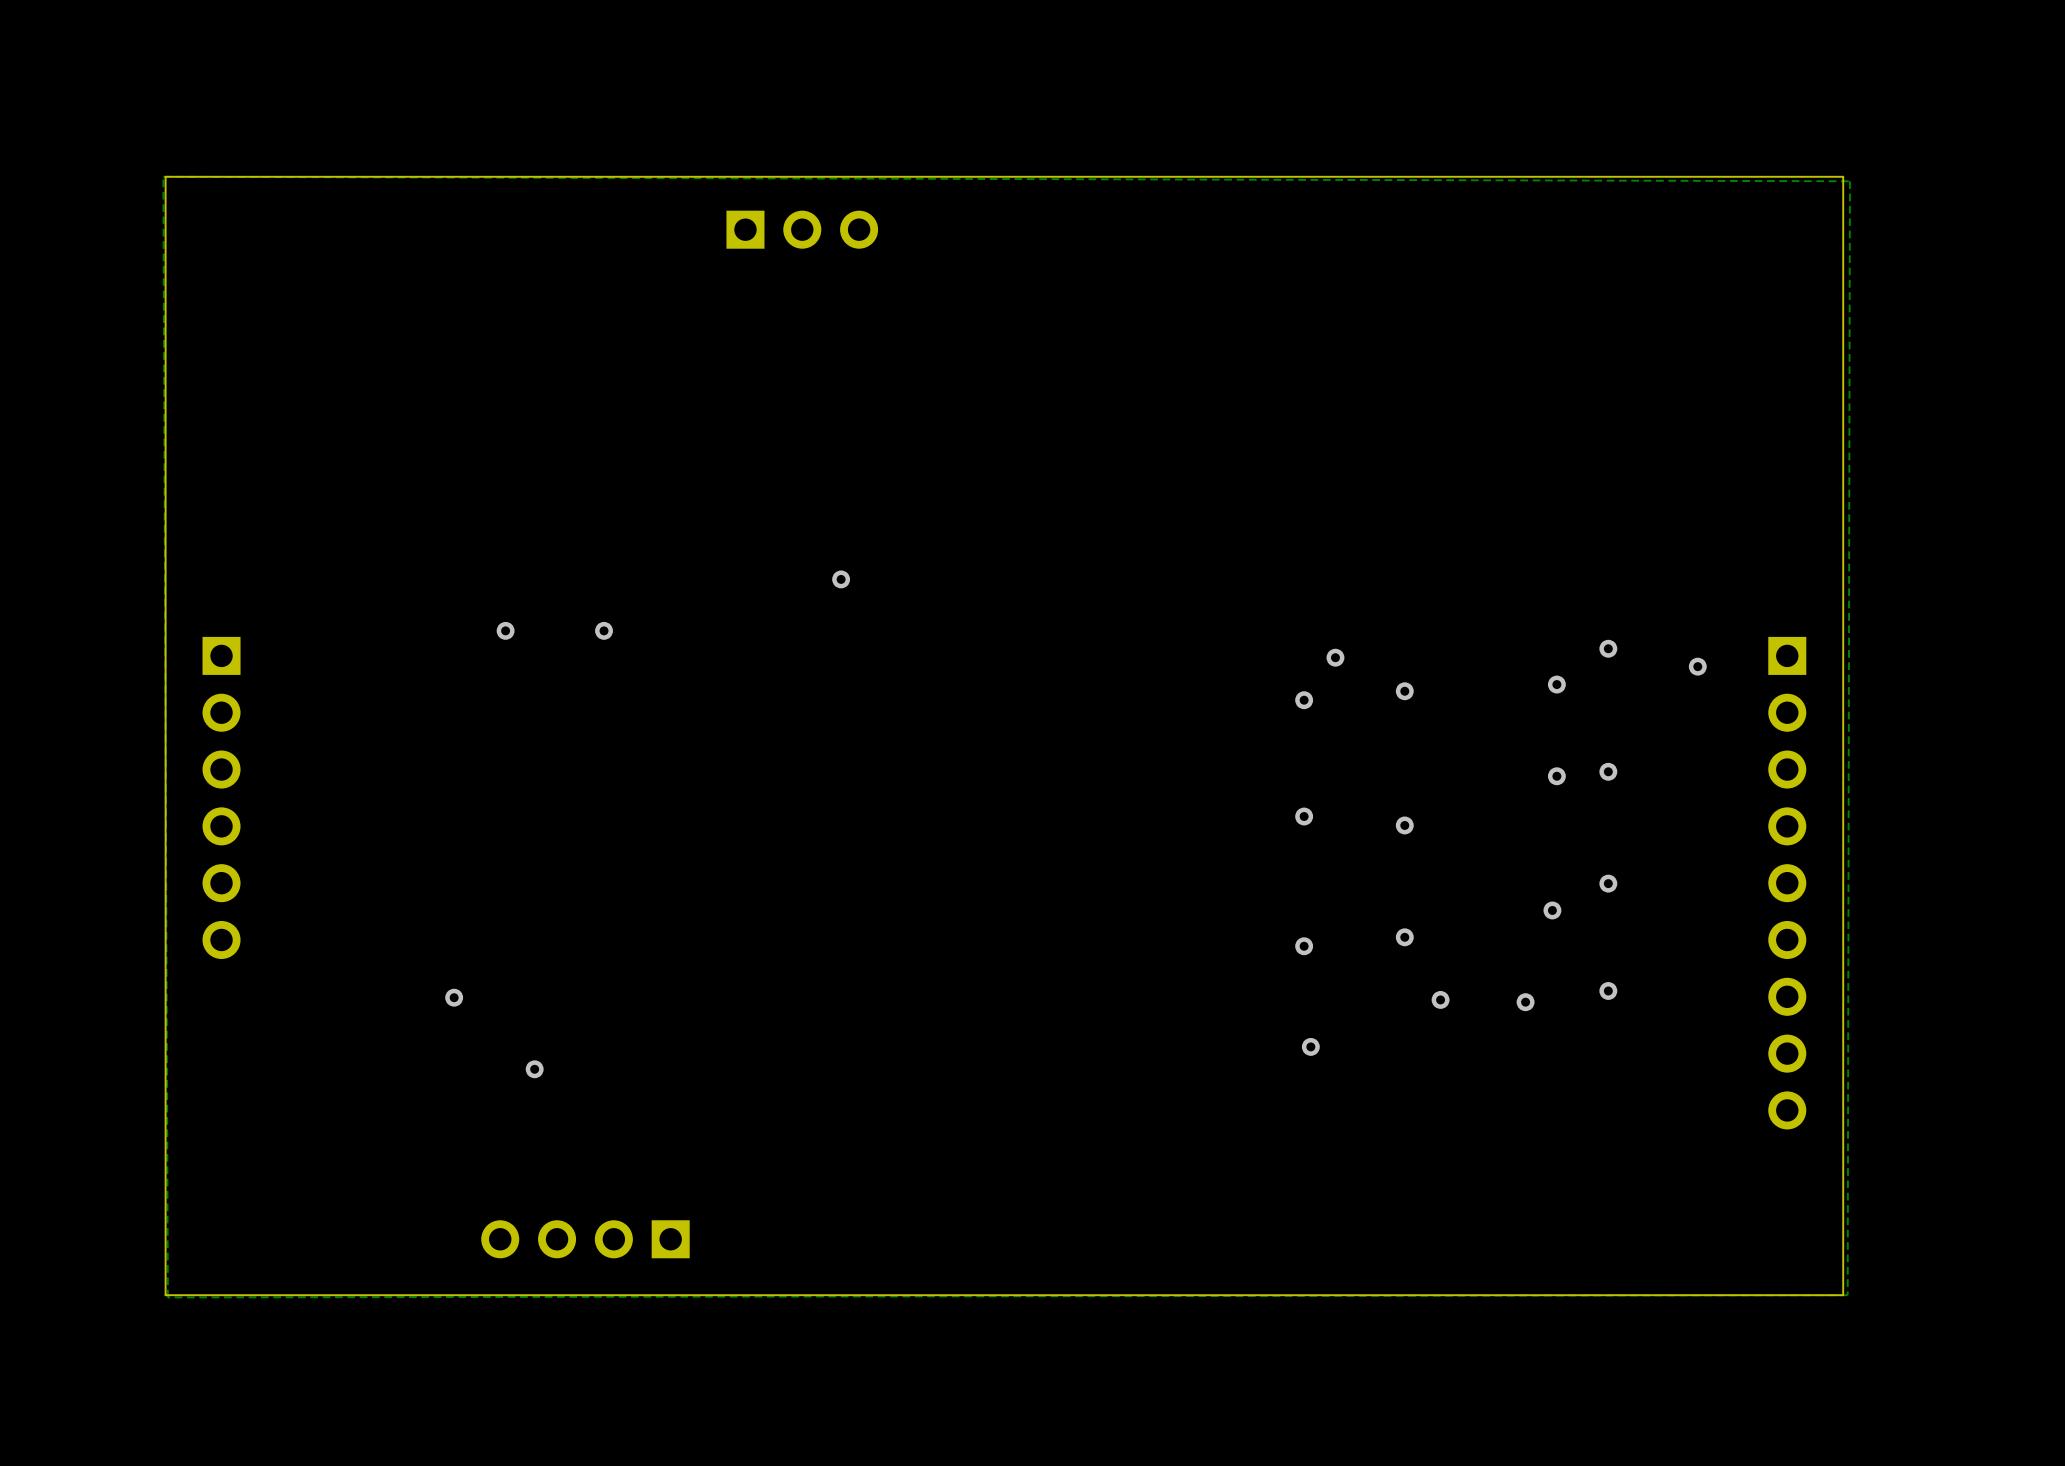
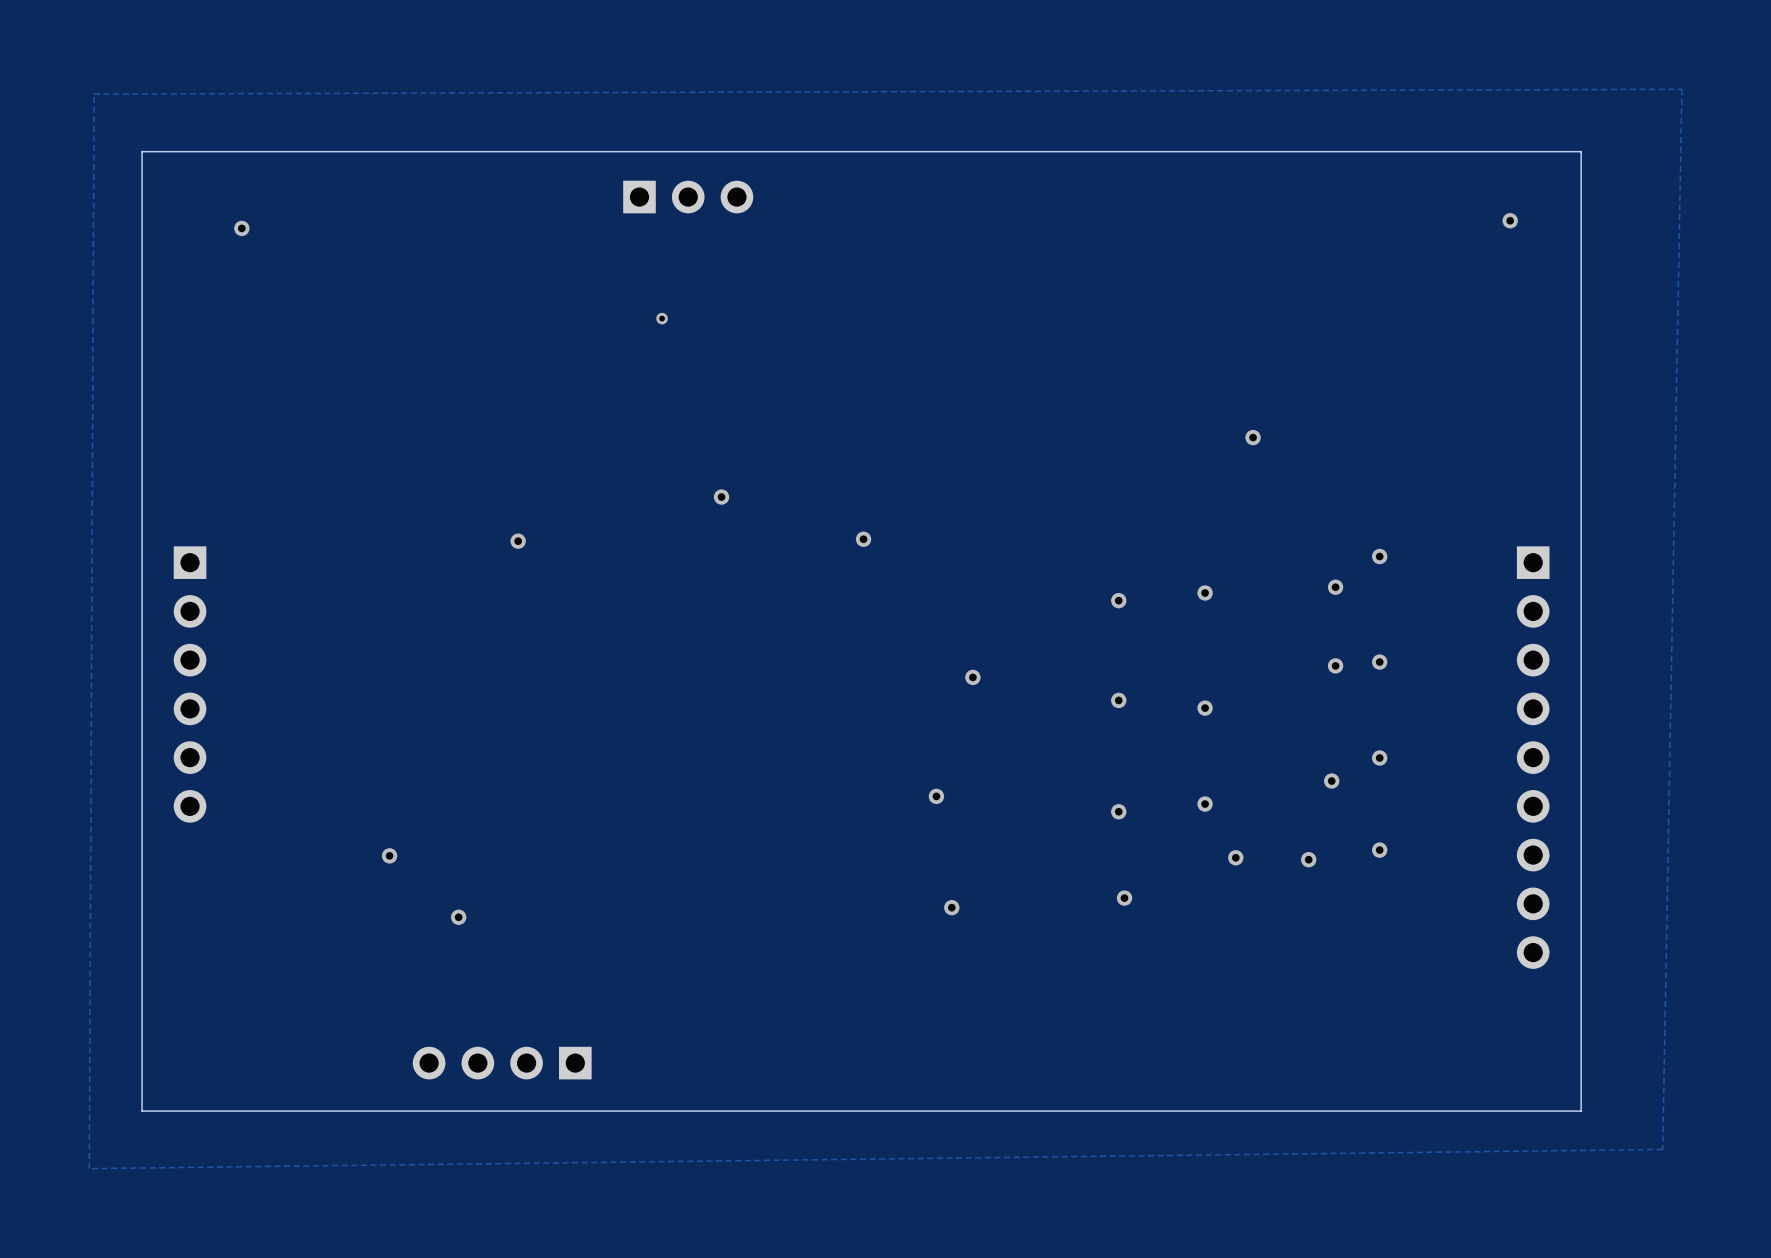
zone outline: (163, 176) (167, 1297) (1847, 1295) (1849, 181) (163, 176) -> (1681, 89) (1662, 1149) (89, 1168) (94, 94) (1681, 89)
via: none -> (1510, 220)
via: none -> (241, 228)
via: none -> (662, 318)
via: none -> (1253, 437)
via: none -> (863, 539)
via: (505, 630) -> none
via: (1335, 657) -> none
via: (1697, 666) -> none
via: none -> (972, 677)
via: none -> (936, 796)
via: none -> (951, 907)

